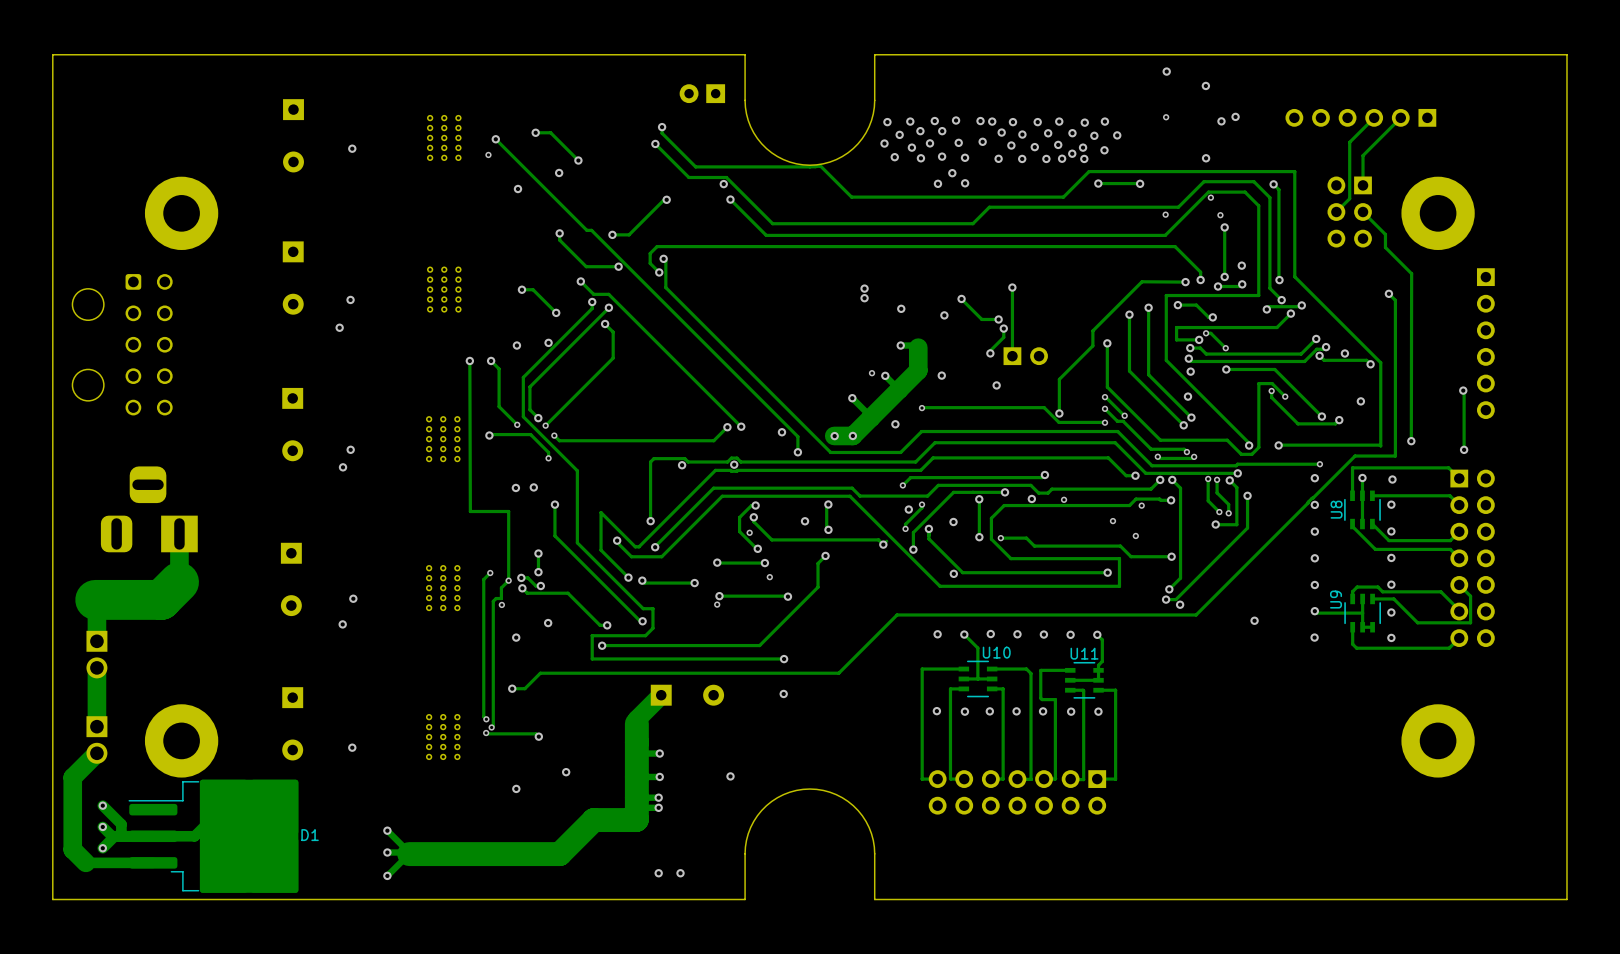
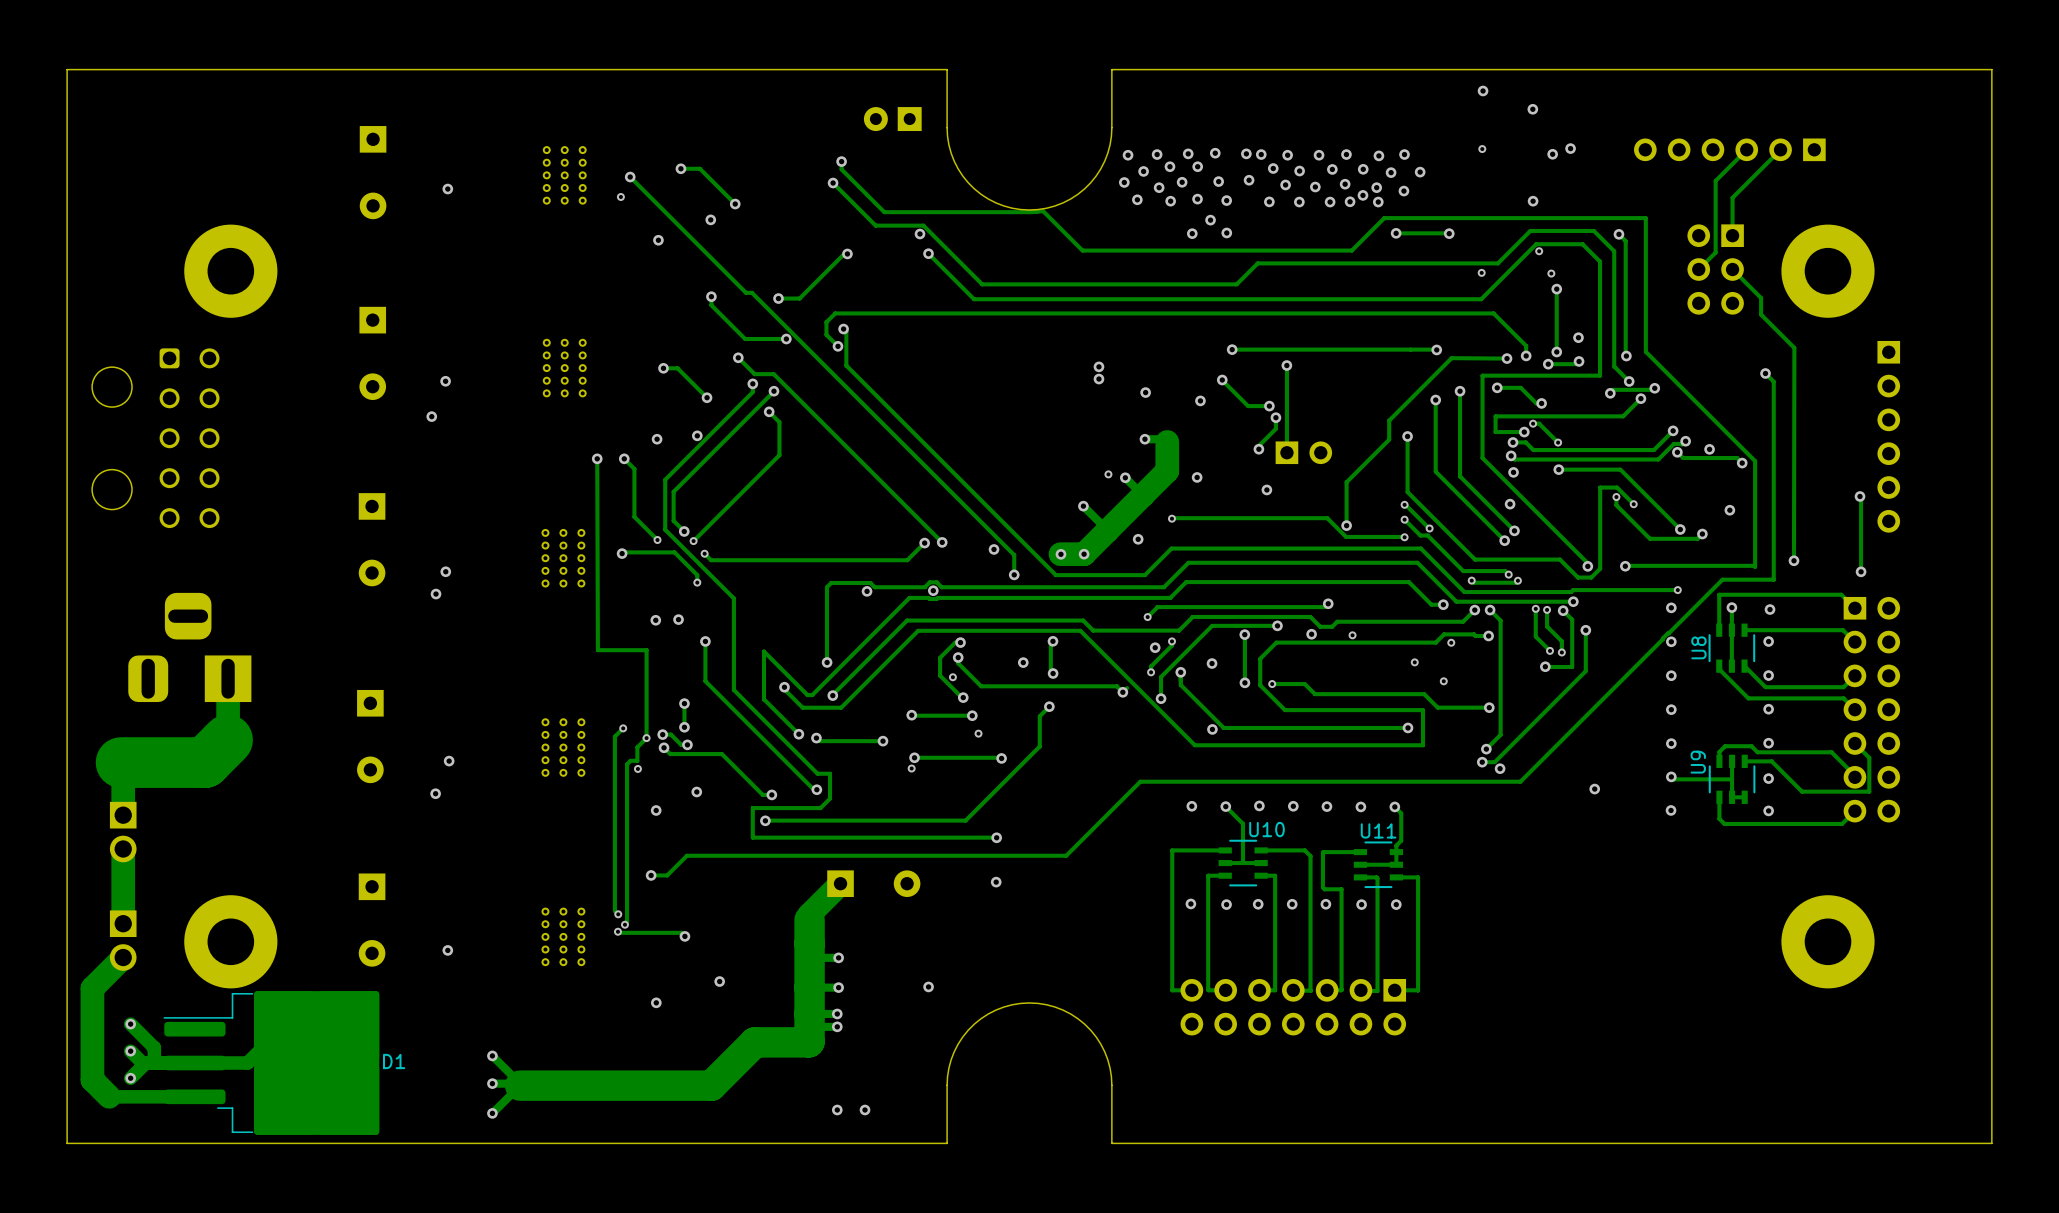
track: none -> (1232, 349) (1437, 349)
via: none -> (1232, 349)
via: none -> (1436, 349)

